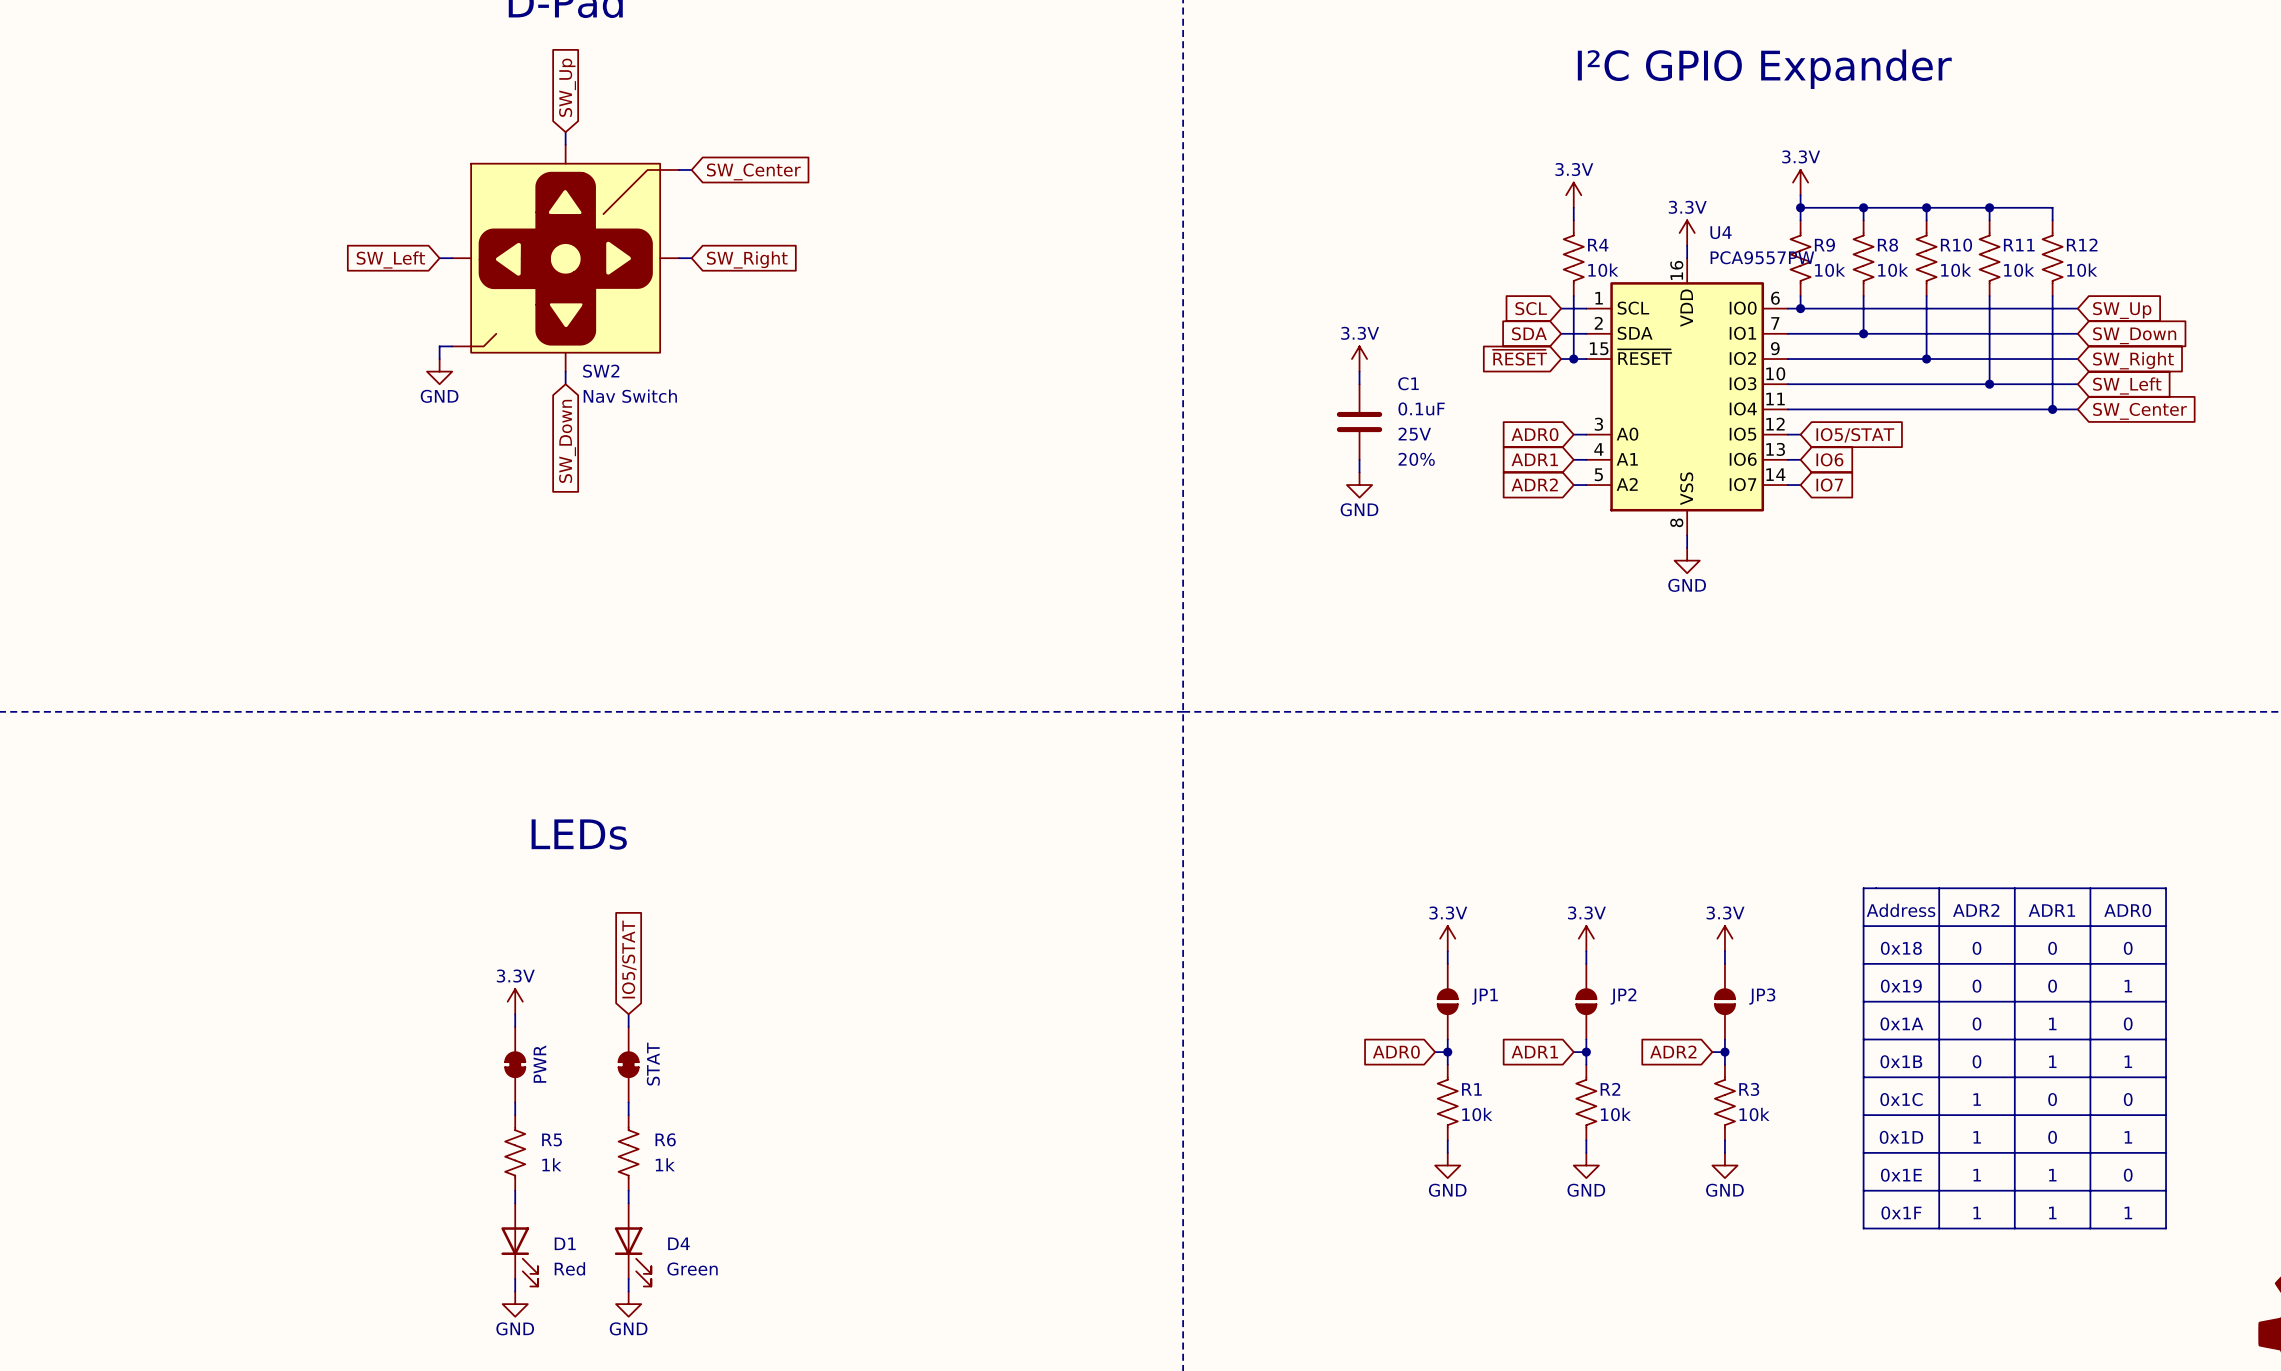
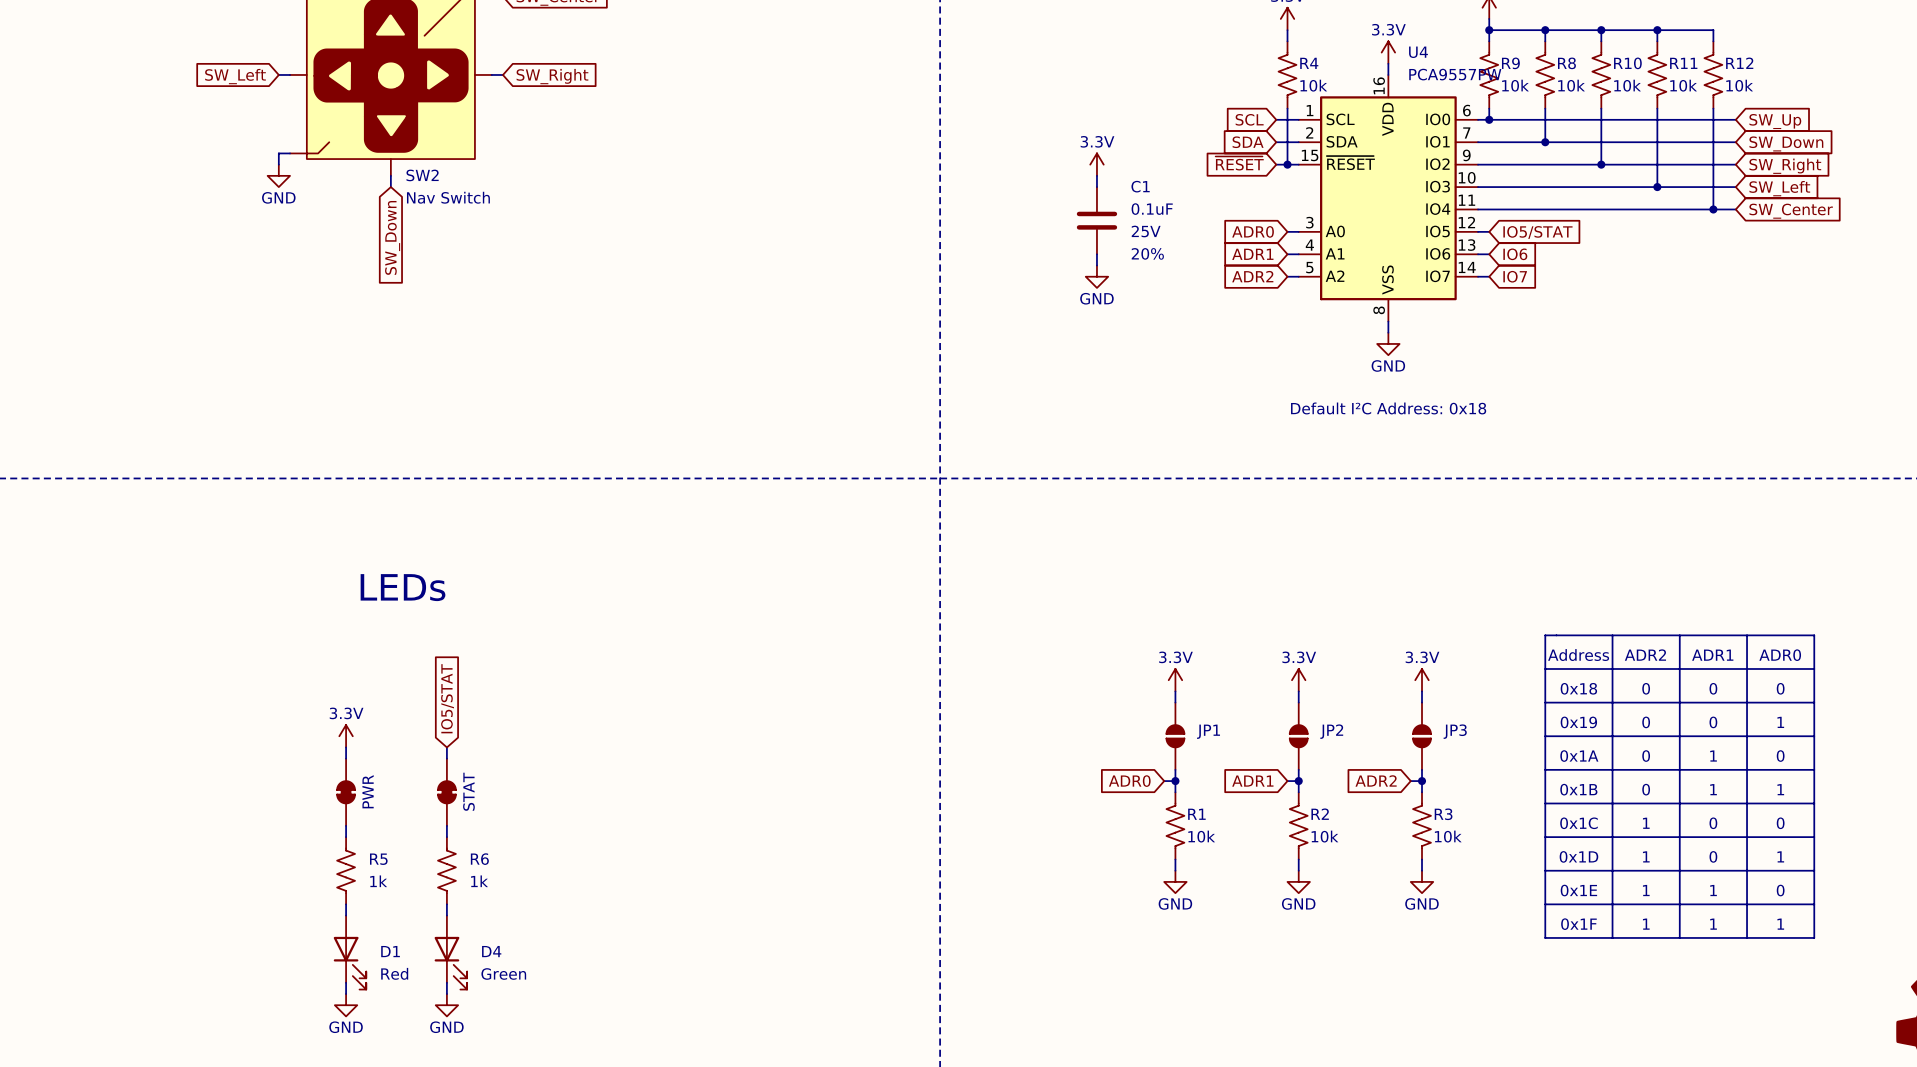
text: none -> Default I²C Address: 0x18 (1388, 408)

